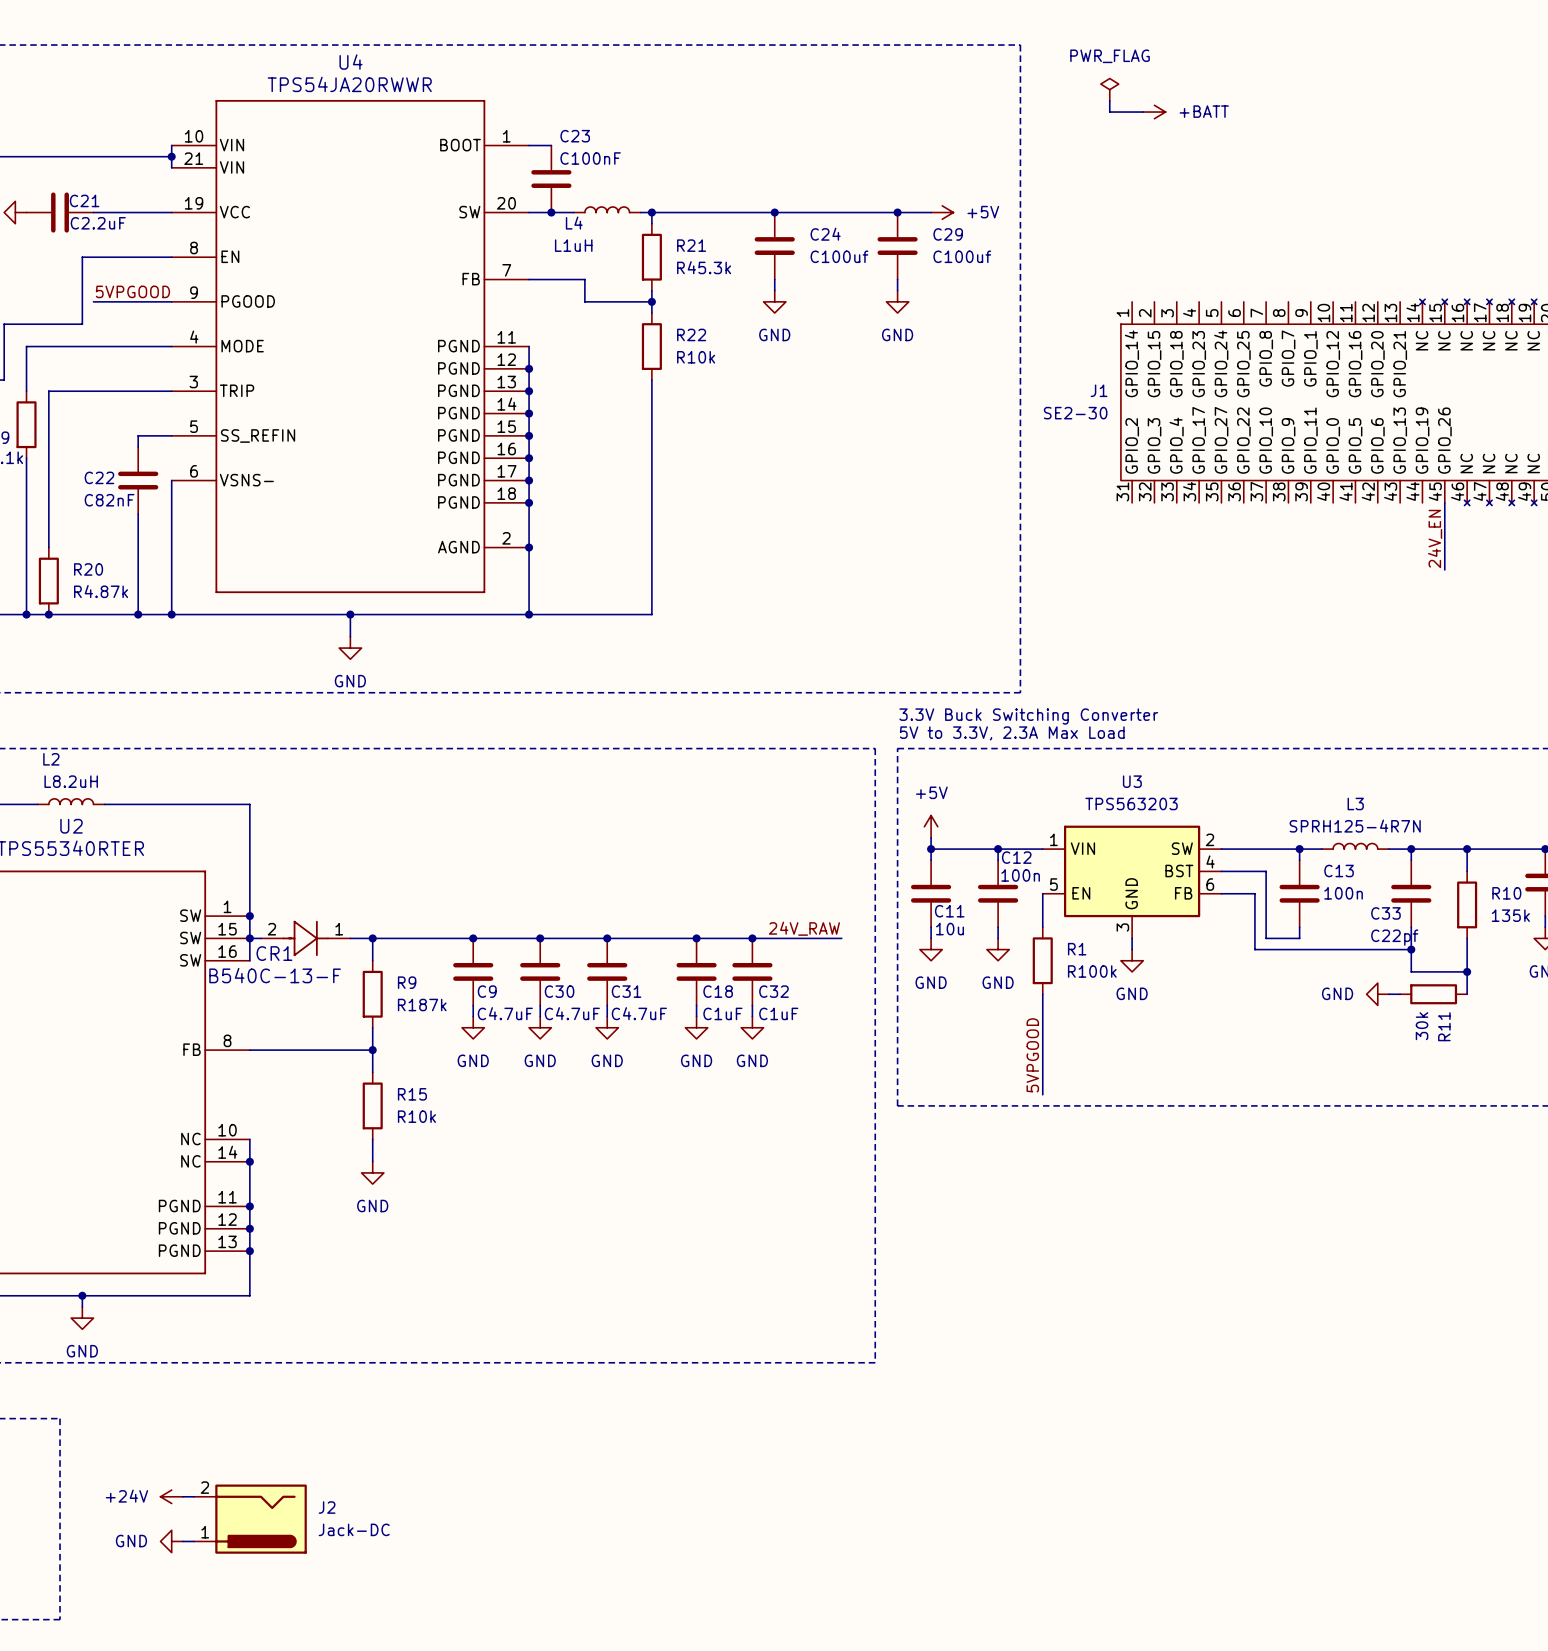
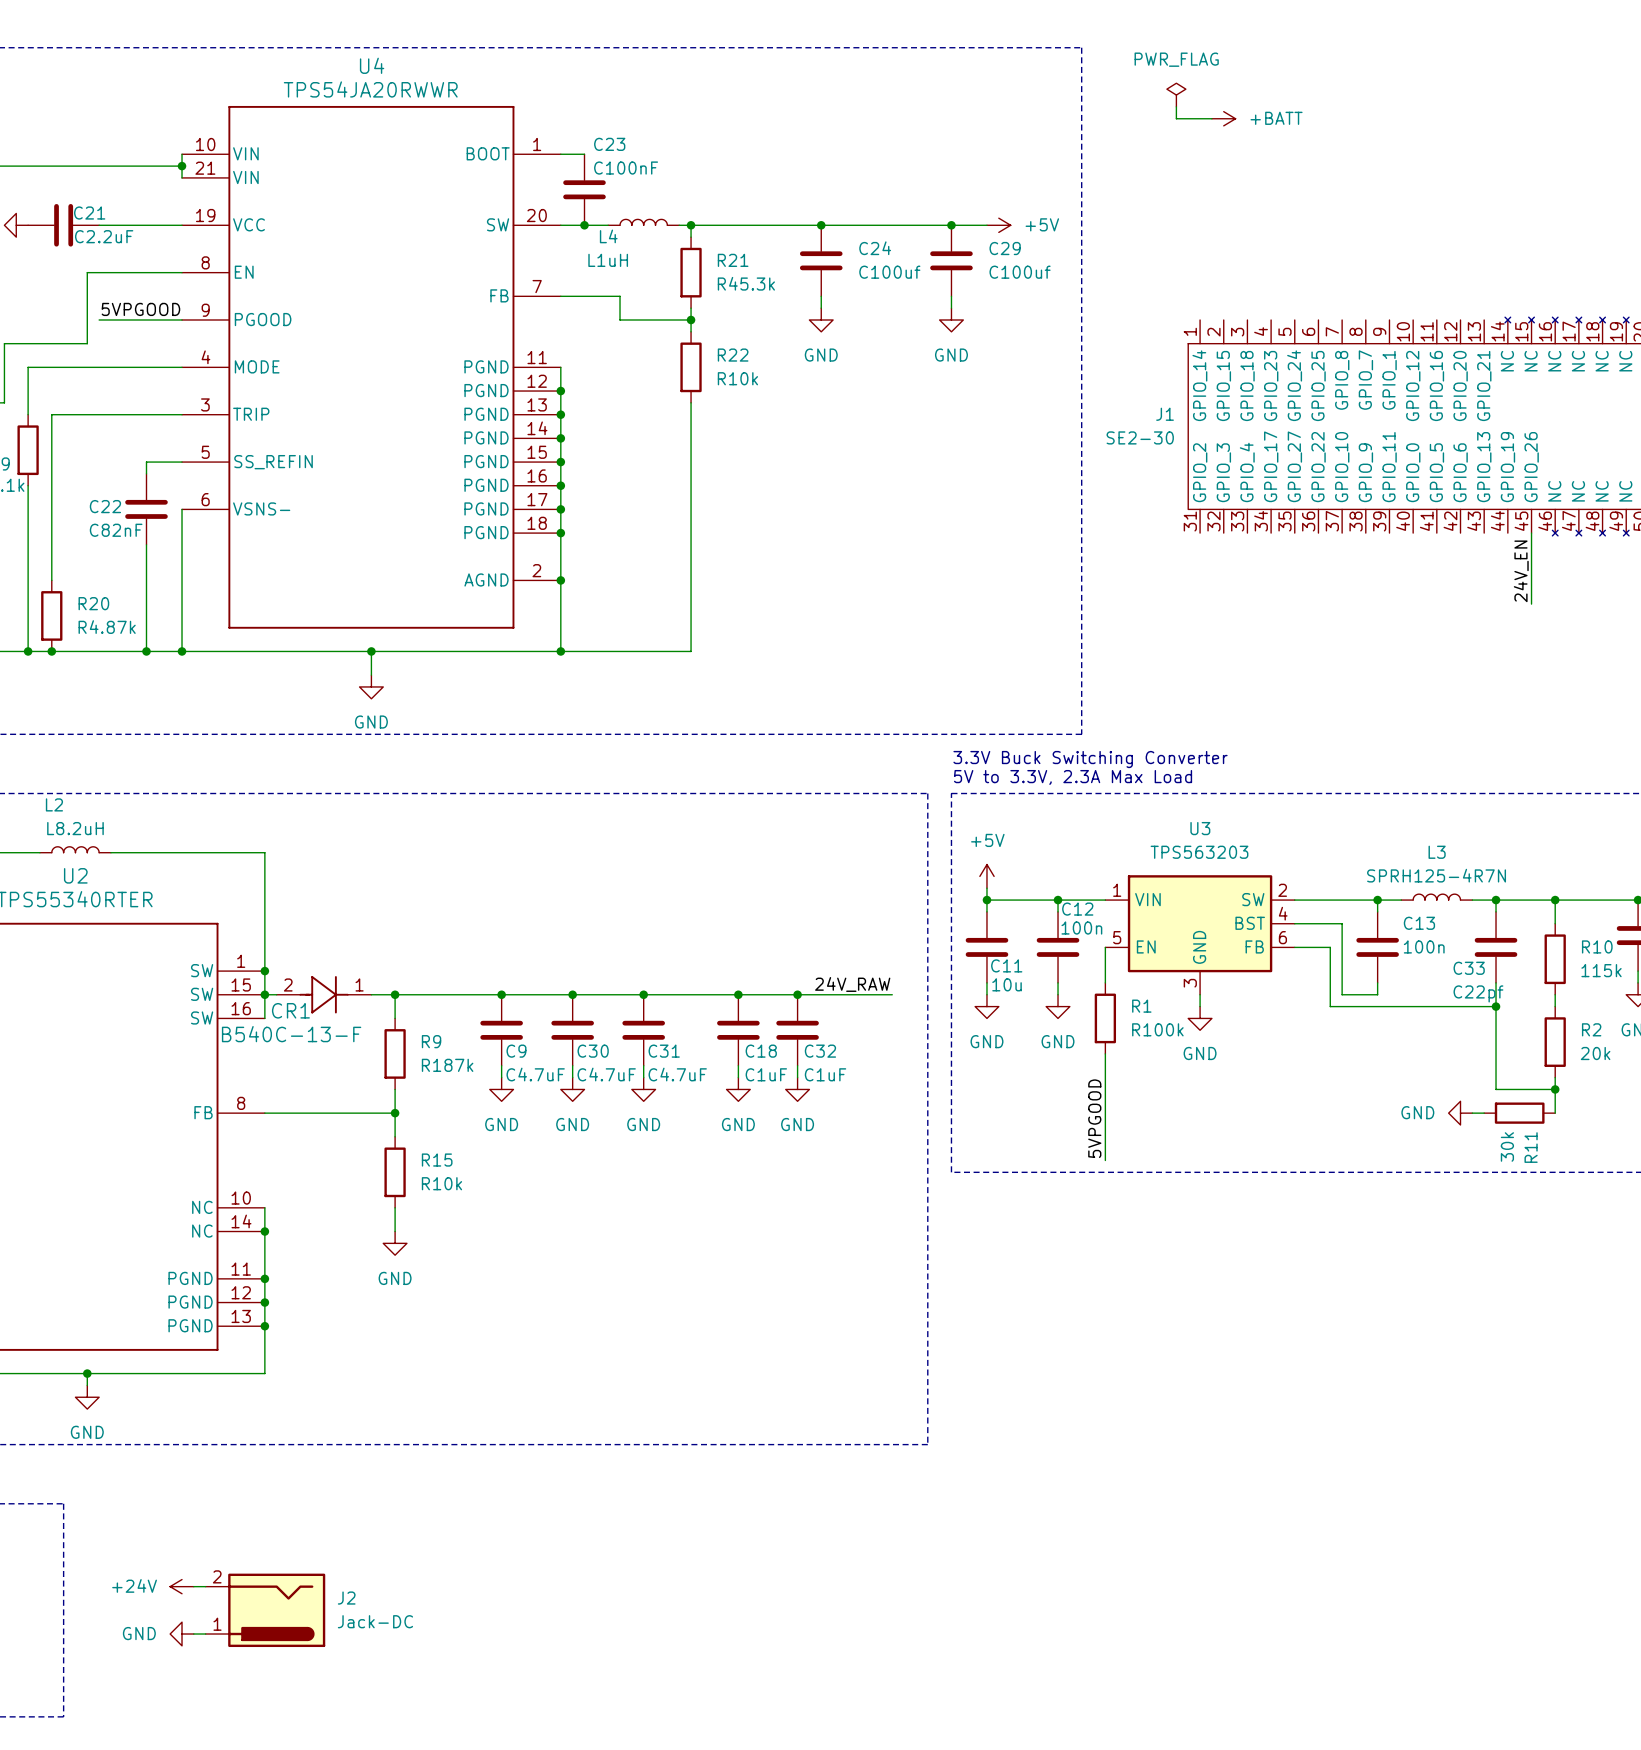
R10 value: 135k (1510, 915) -> 115k (1601, 970)
wire: (1467, 949) (1467, 994) -> none
wire: (1411, 971) (1467, 971) -> (1496, 1030) (1496, 1089) (1555, 1089)
junction: (1467, 971) -> none
R2: none -> 20k (1555, 1042)
power symbol position: GND (1377, 994) -> GND (1460, 1113)
wire: (1388, 994) (1400, 994) -> (1472, 1113) (1484, 1113)
R11 position: (1433, 994) -> (1519, 1113)
wire: none -> (1555, 1077) (1555, 1113)
junction: none -> (1555, 1089)

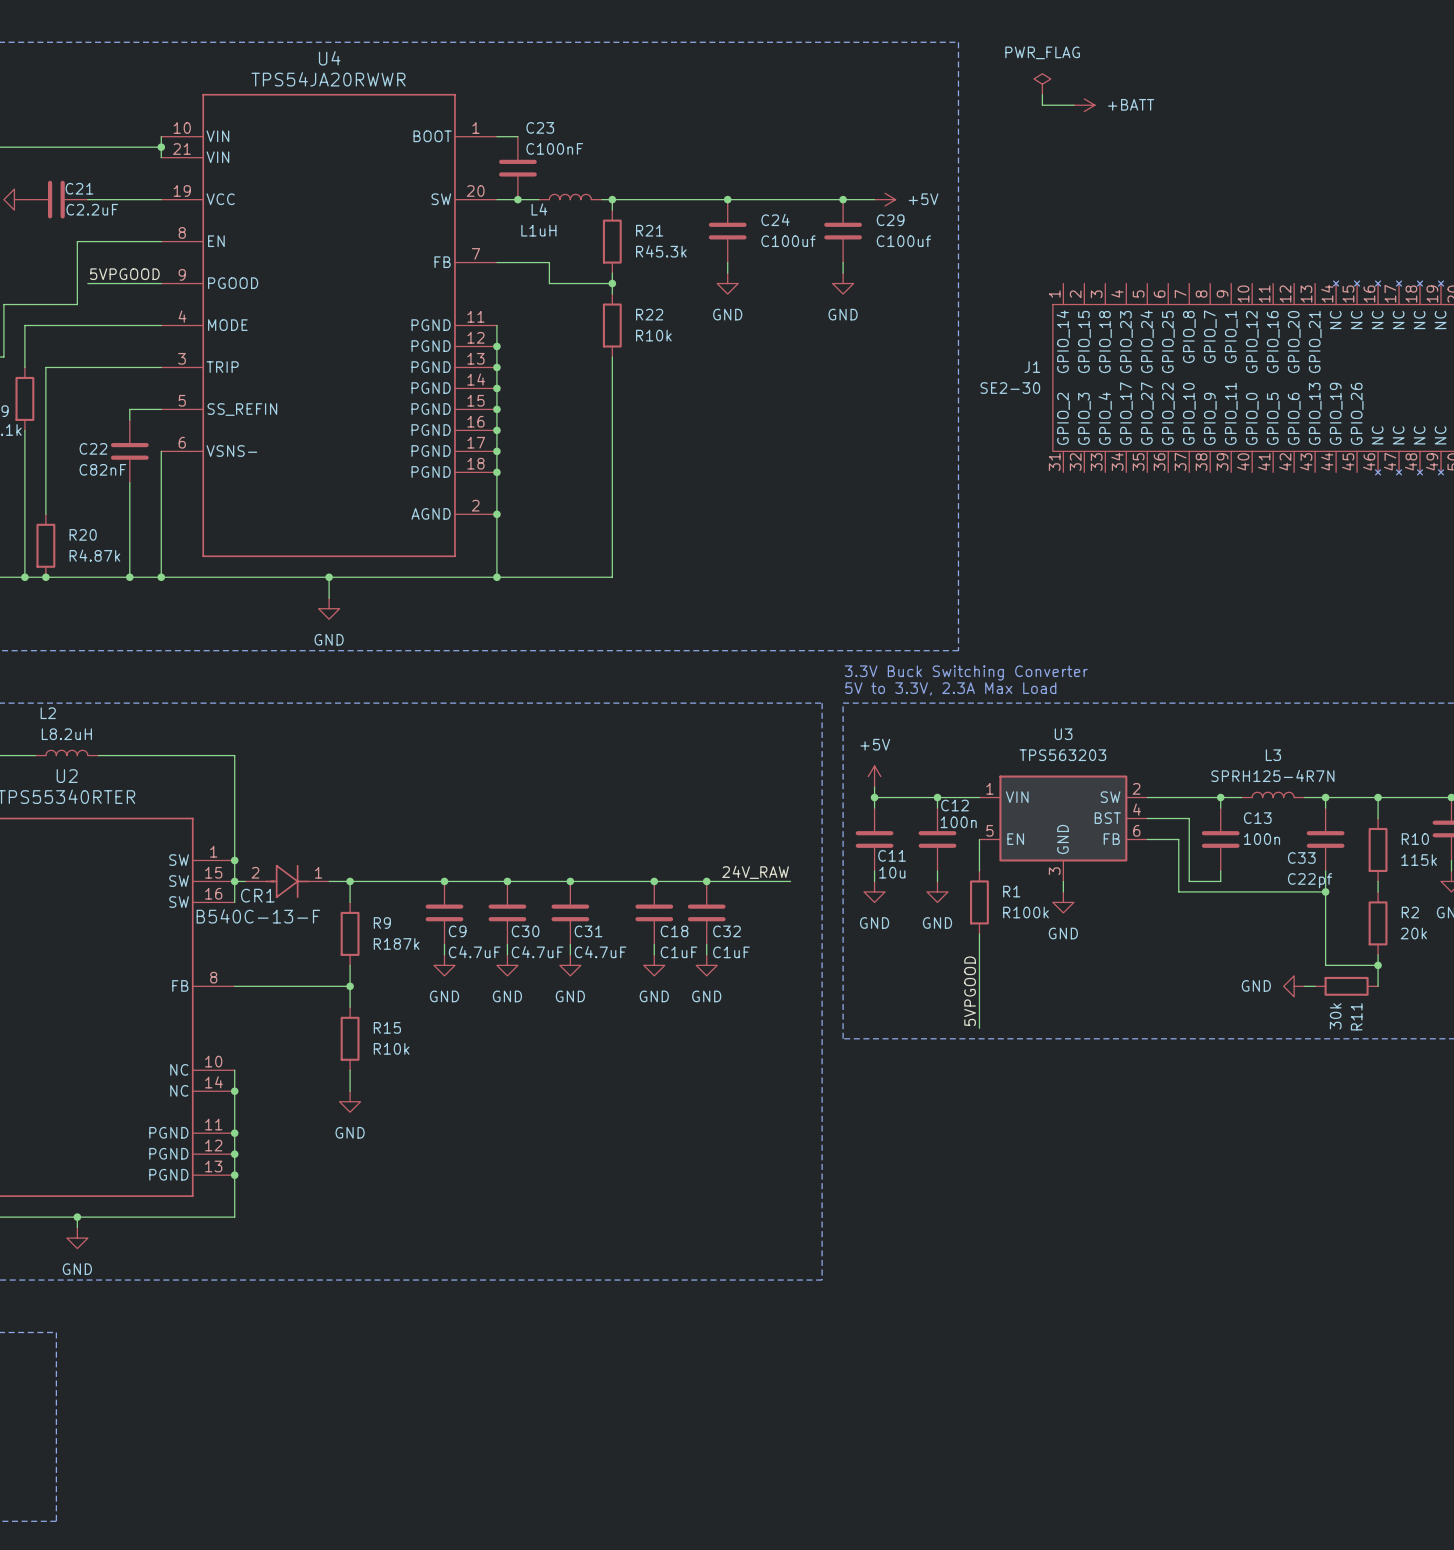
wire: (1531, 533) (1531, 604) -> none
label: 24V_EN (1521, 571) -> none
power symbol: +24V (182, 1586) -> none
wire: (193, 1586) (205, 1586) -> none
J2: Jack-DC (265, 1610) -> none
power symbol: GND (182, 1634) -> none
wire: (193, 1634) (205, 1634) -> none

